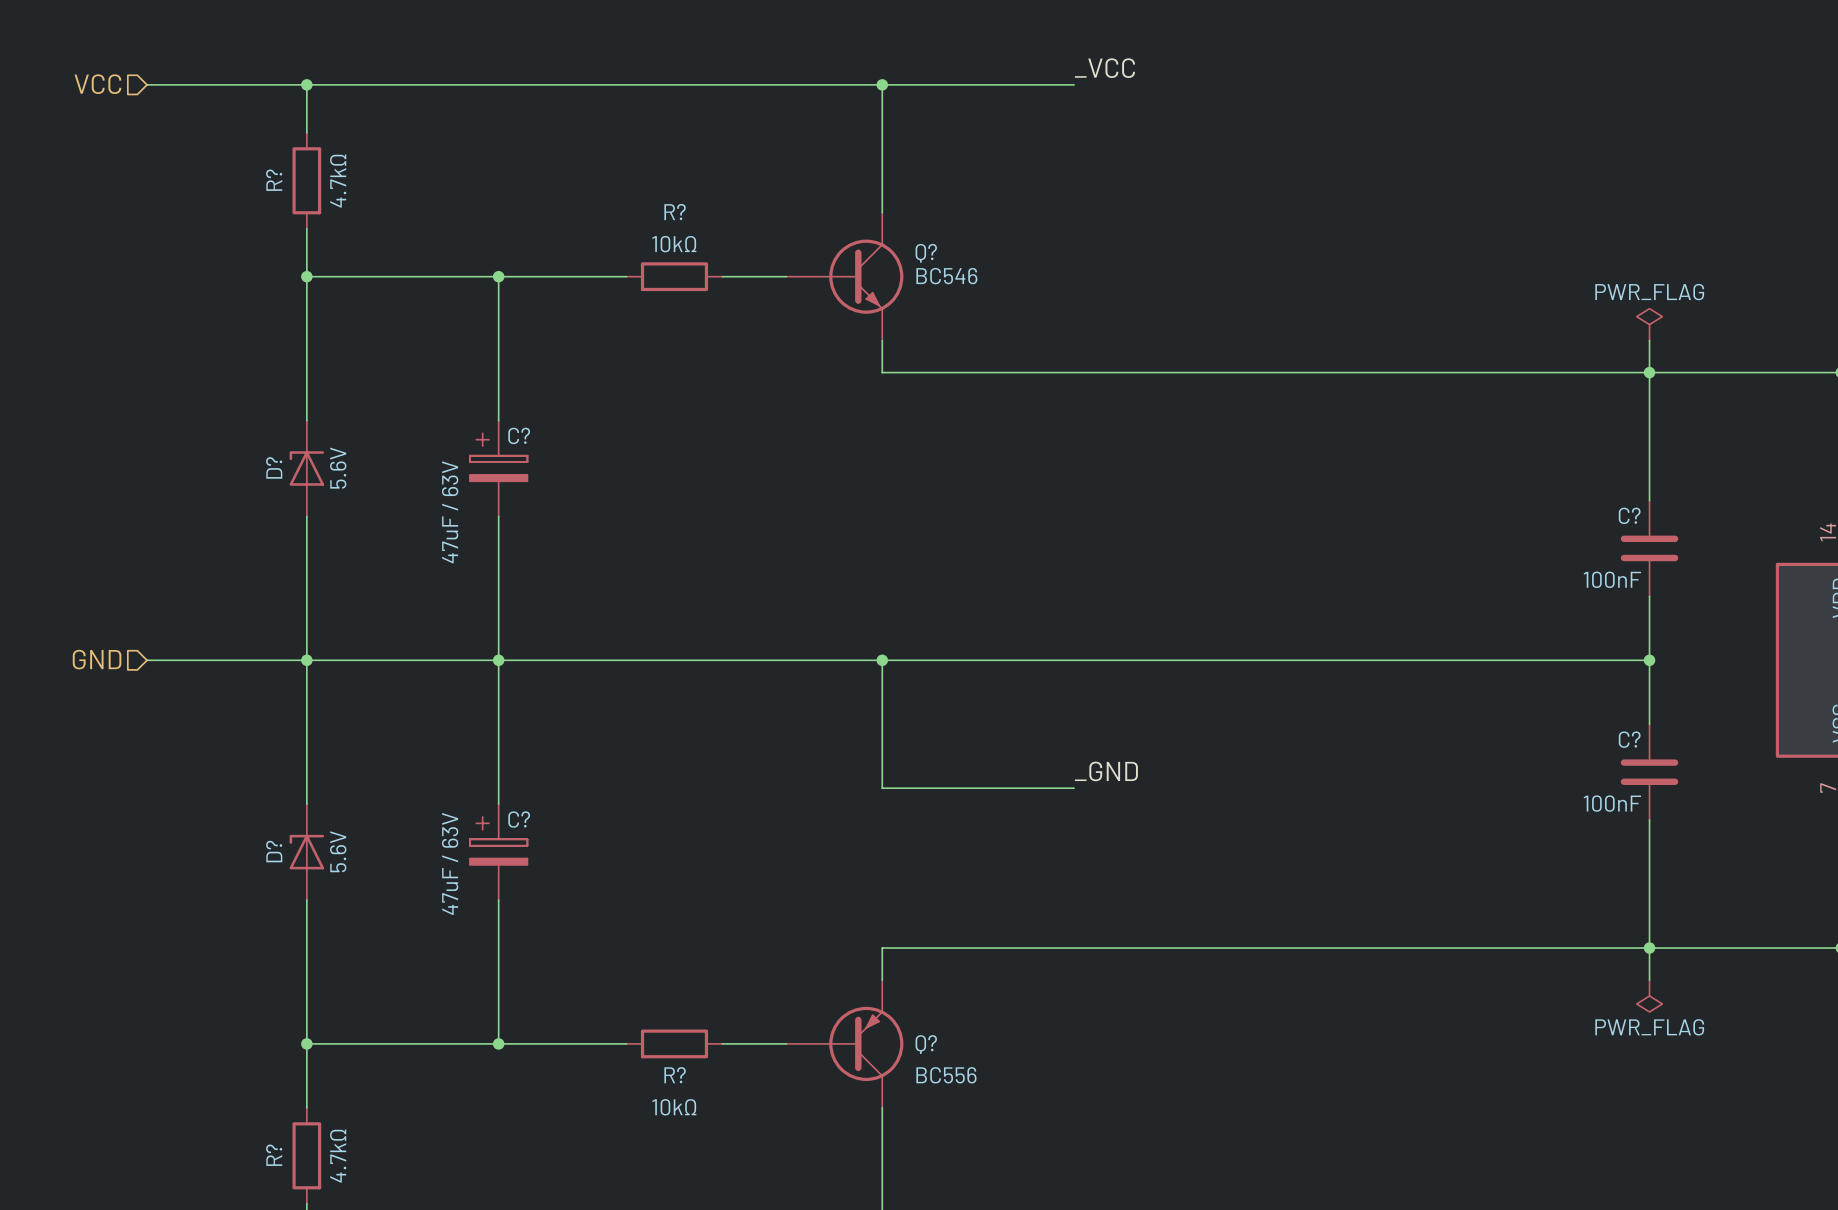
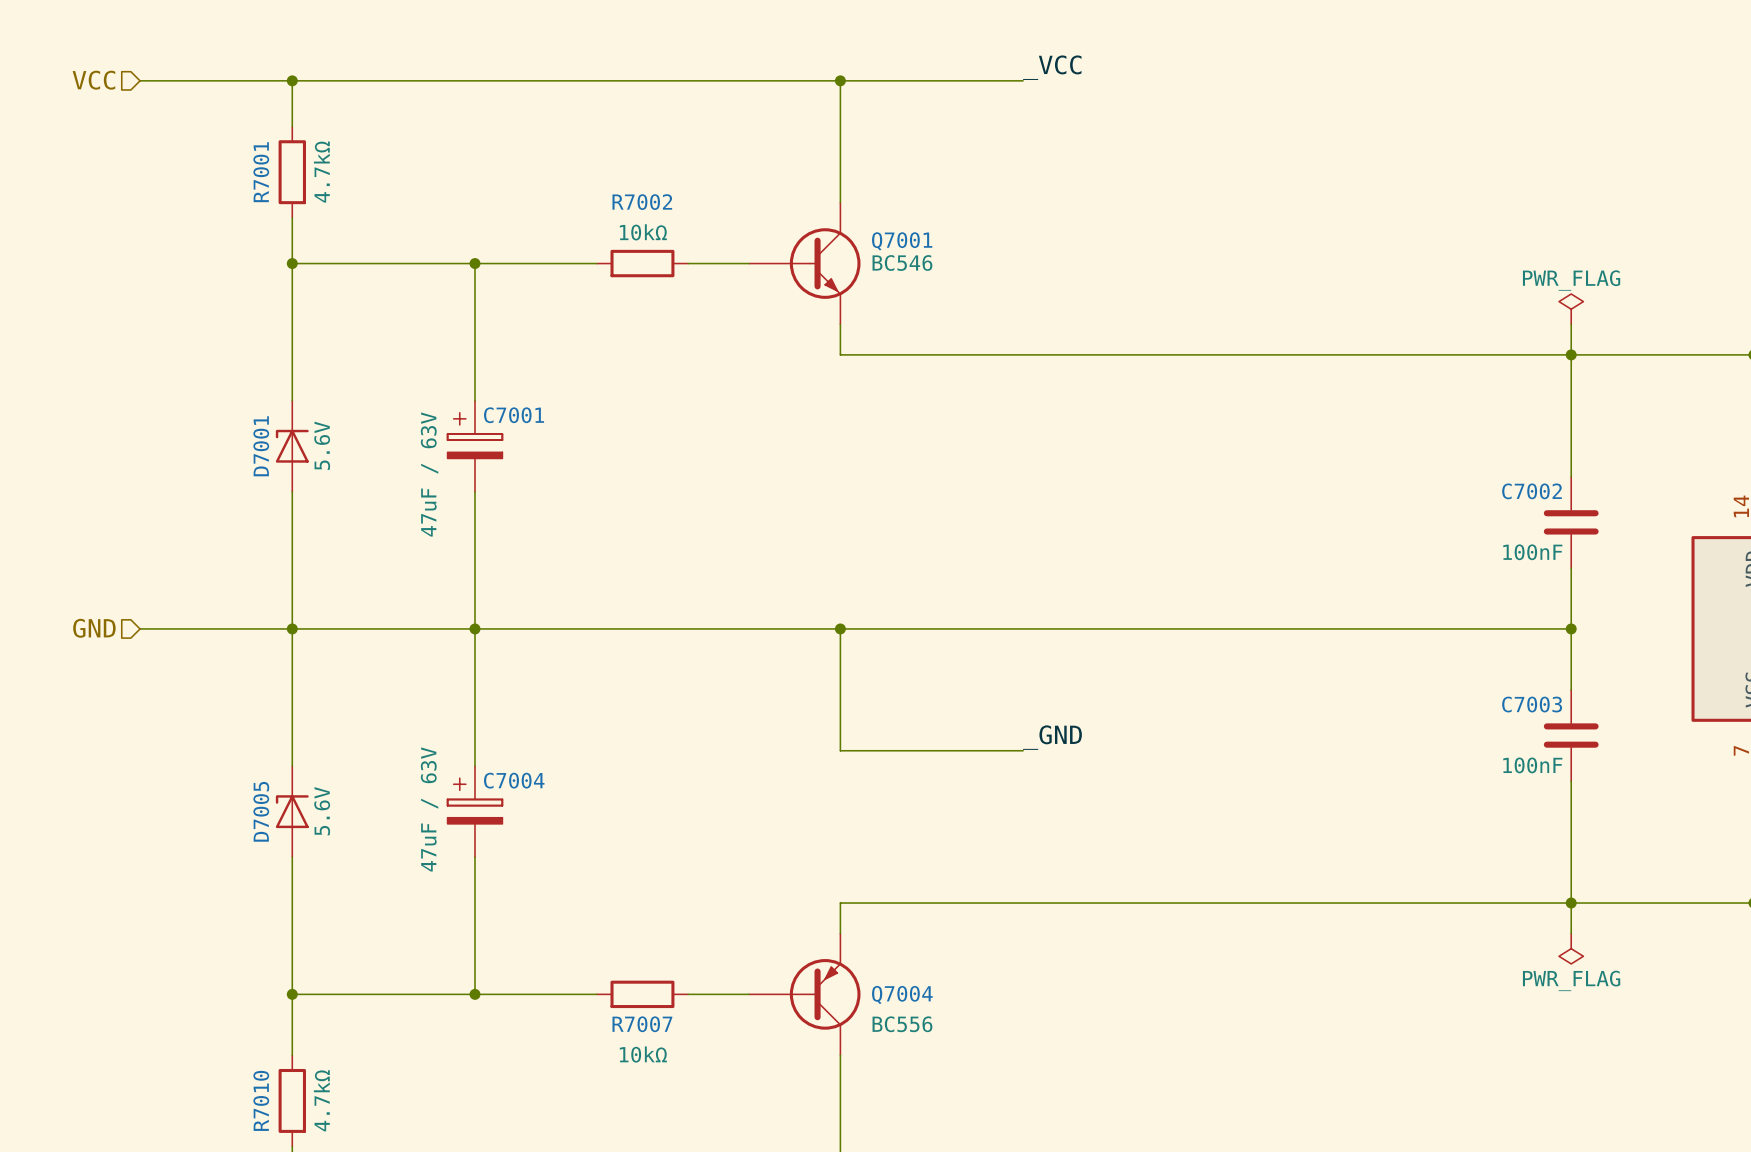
R? name: R? (274, 180) -> R7001 (261, 172)
R? name: R? (675, 212) -> R7002 (642, 202)
Q? name: Q? (926, 253) -> Q7001 (902, 241)
C? name: C? (519, 435) -> C7001 (514, 415)
D? name: D? (274, 467) -> D7001 (261, 446)
C? name: C? (1629, 515) -> C7002 (1531, 491)
C? name: C? (1629, 739) -> C7003 (1532, 704)
C? name: C? (519, 819) -> C7004 (514, 780)
D? name: D? (274, 851) -> D7005 (261, 811)
Q? name: Q? (926, 1044) -> Q7004 (902, 995)
R? name: R? (675, 1075) -> R7007 (642, 1024)
R? name: R? (274, 1155) -> R7010 (261, 1100)

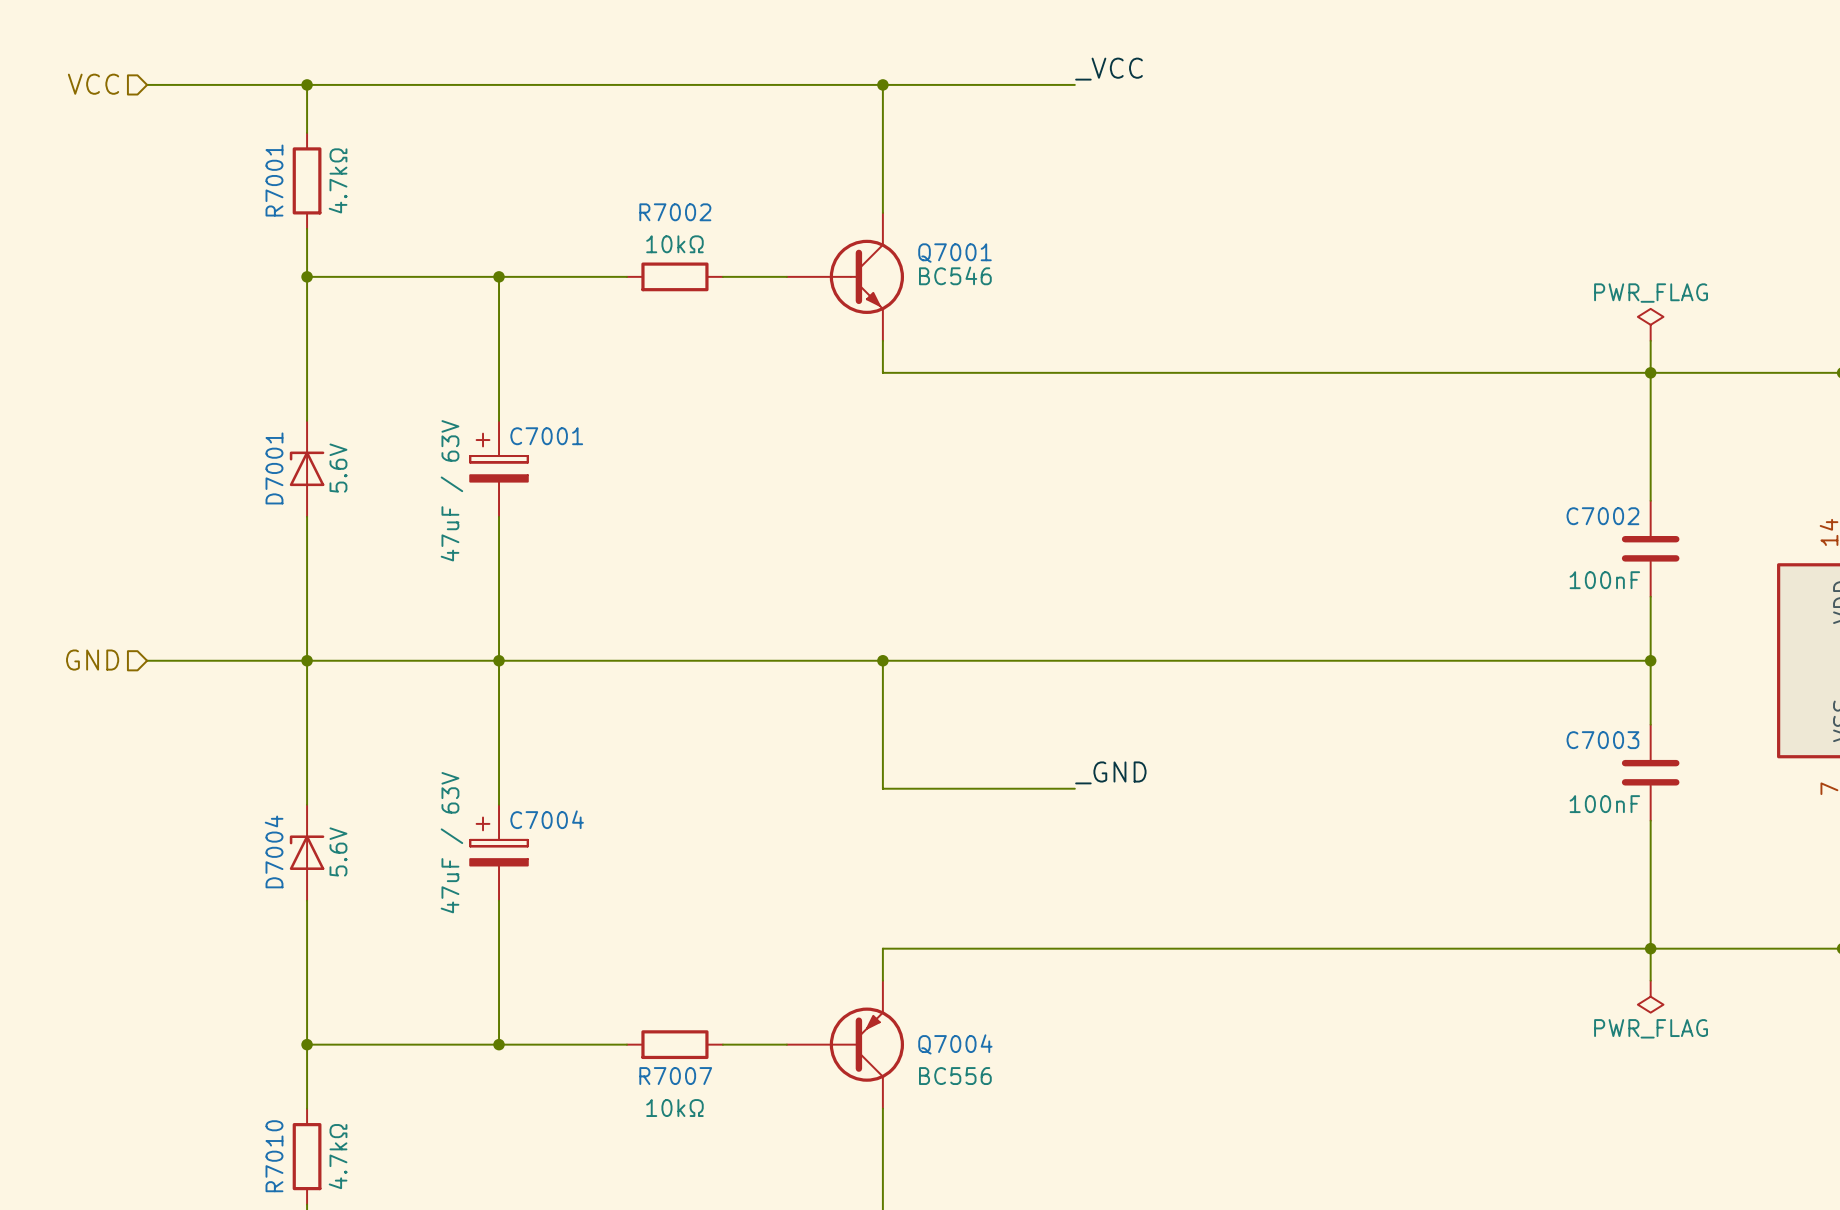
D7005 name: D7005 (261, 811) -> D7004 (274, 851)

